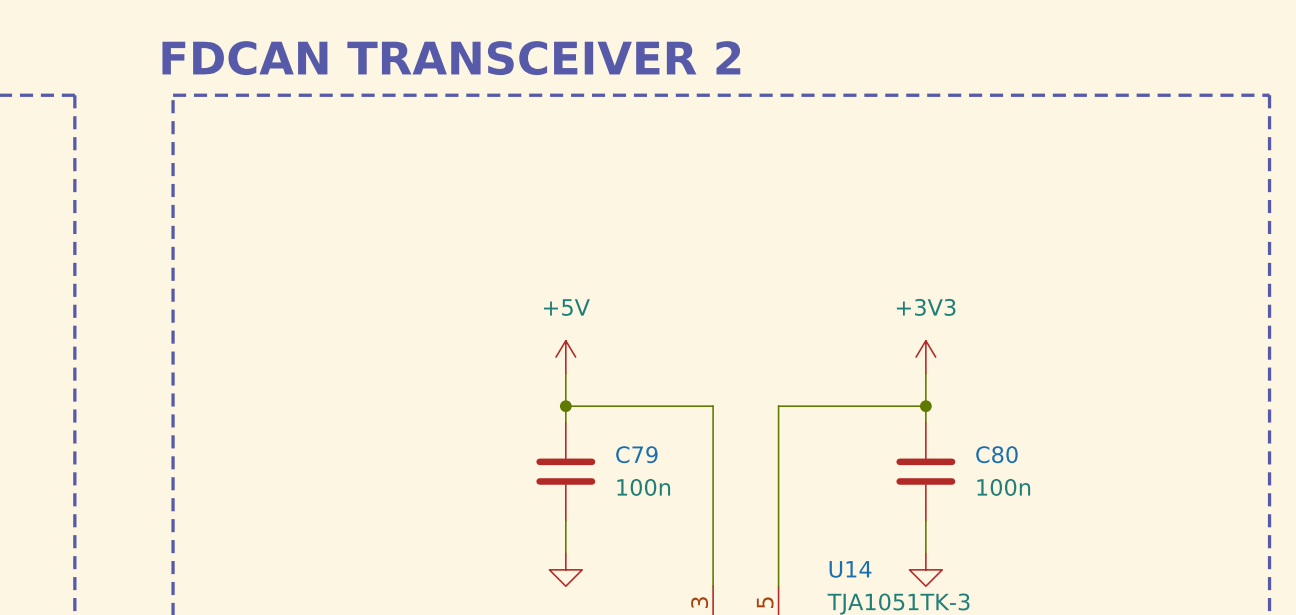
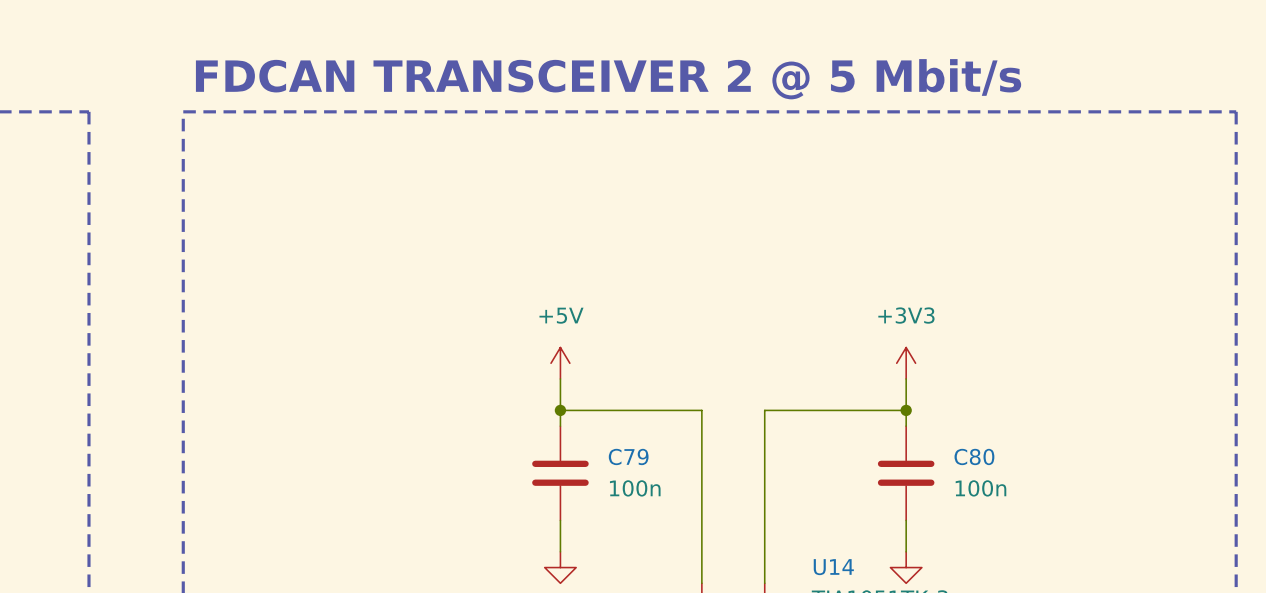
text: FDCAN TRANSCEIVER 2 (451, 58) -> FDCAN TRANSCEIVER 2 @ 5 Mbit/s (608, 79)

